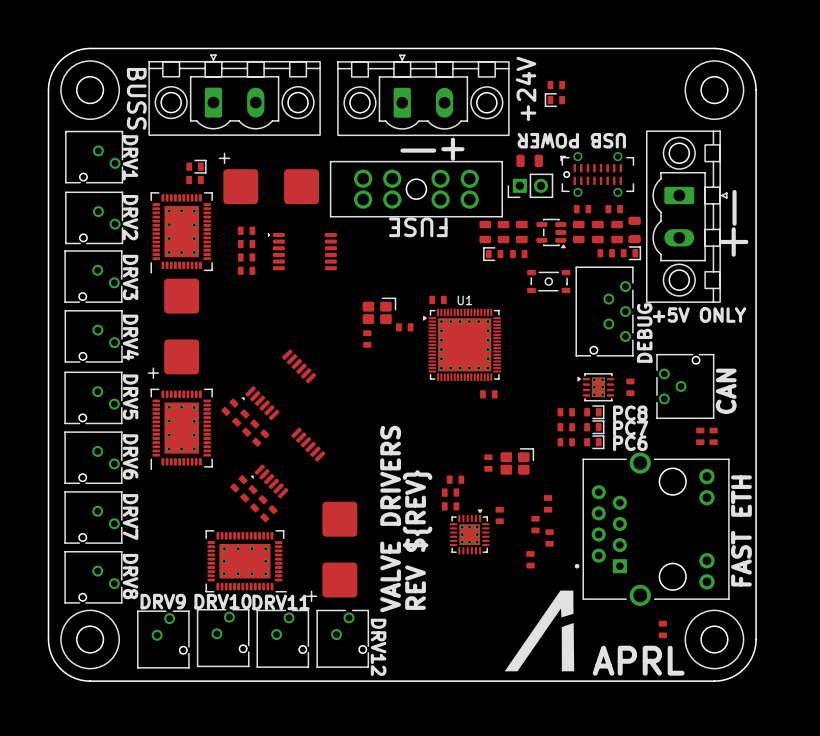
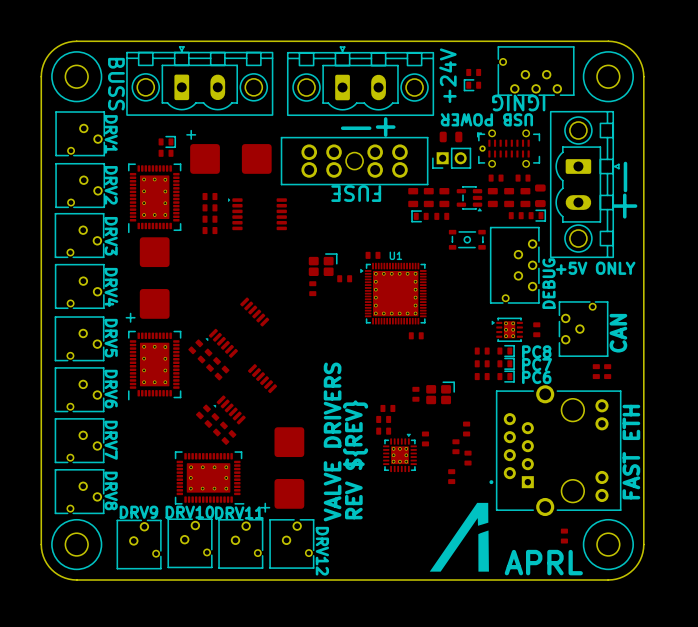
part: none -> (536, 71)
text: none -> IGNIG (518, 102)

